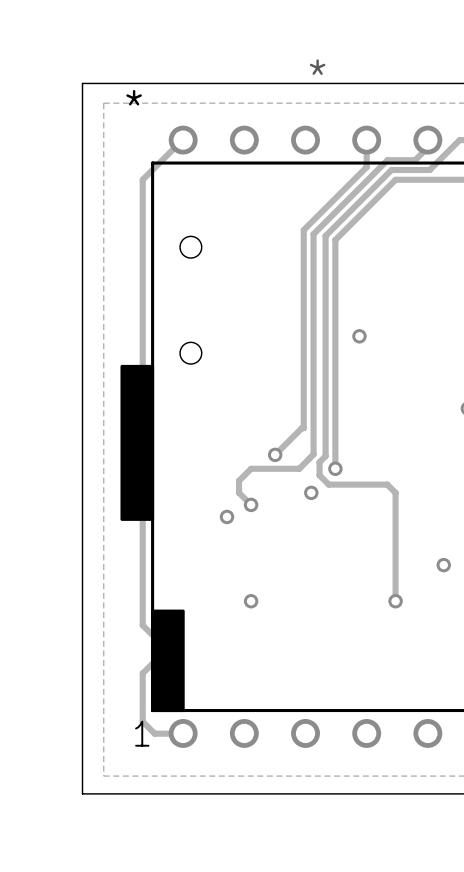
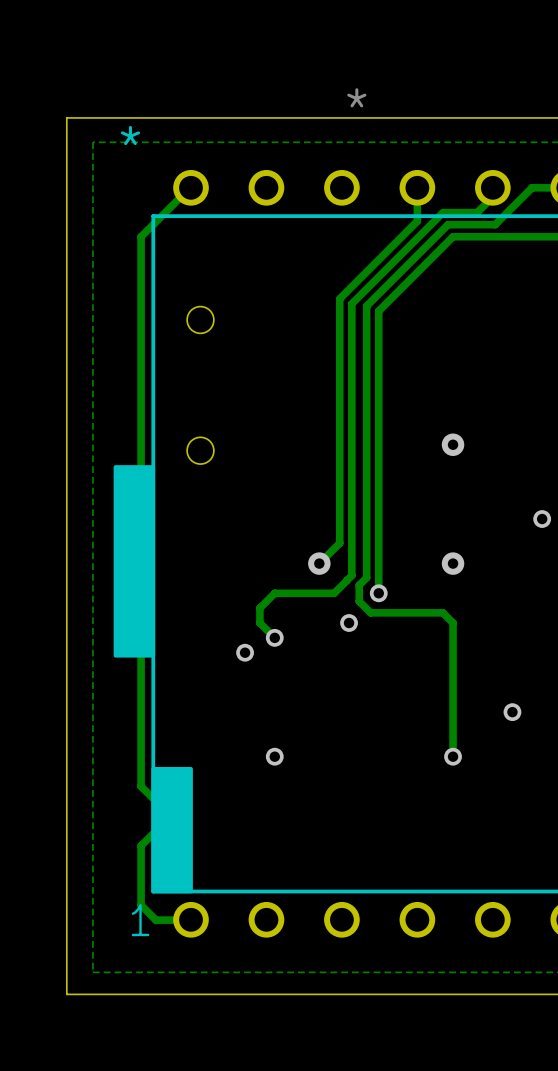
via: (359, 336) -> none
via: none -> (453, 444)
track: (303, 428) (275, 454) -> (339, 543) (319, 563)
via: none -> (453, 563)
via position: (275, 454) -> (319, 563)

